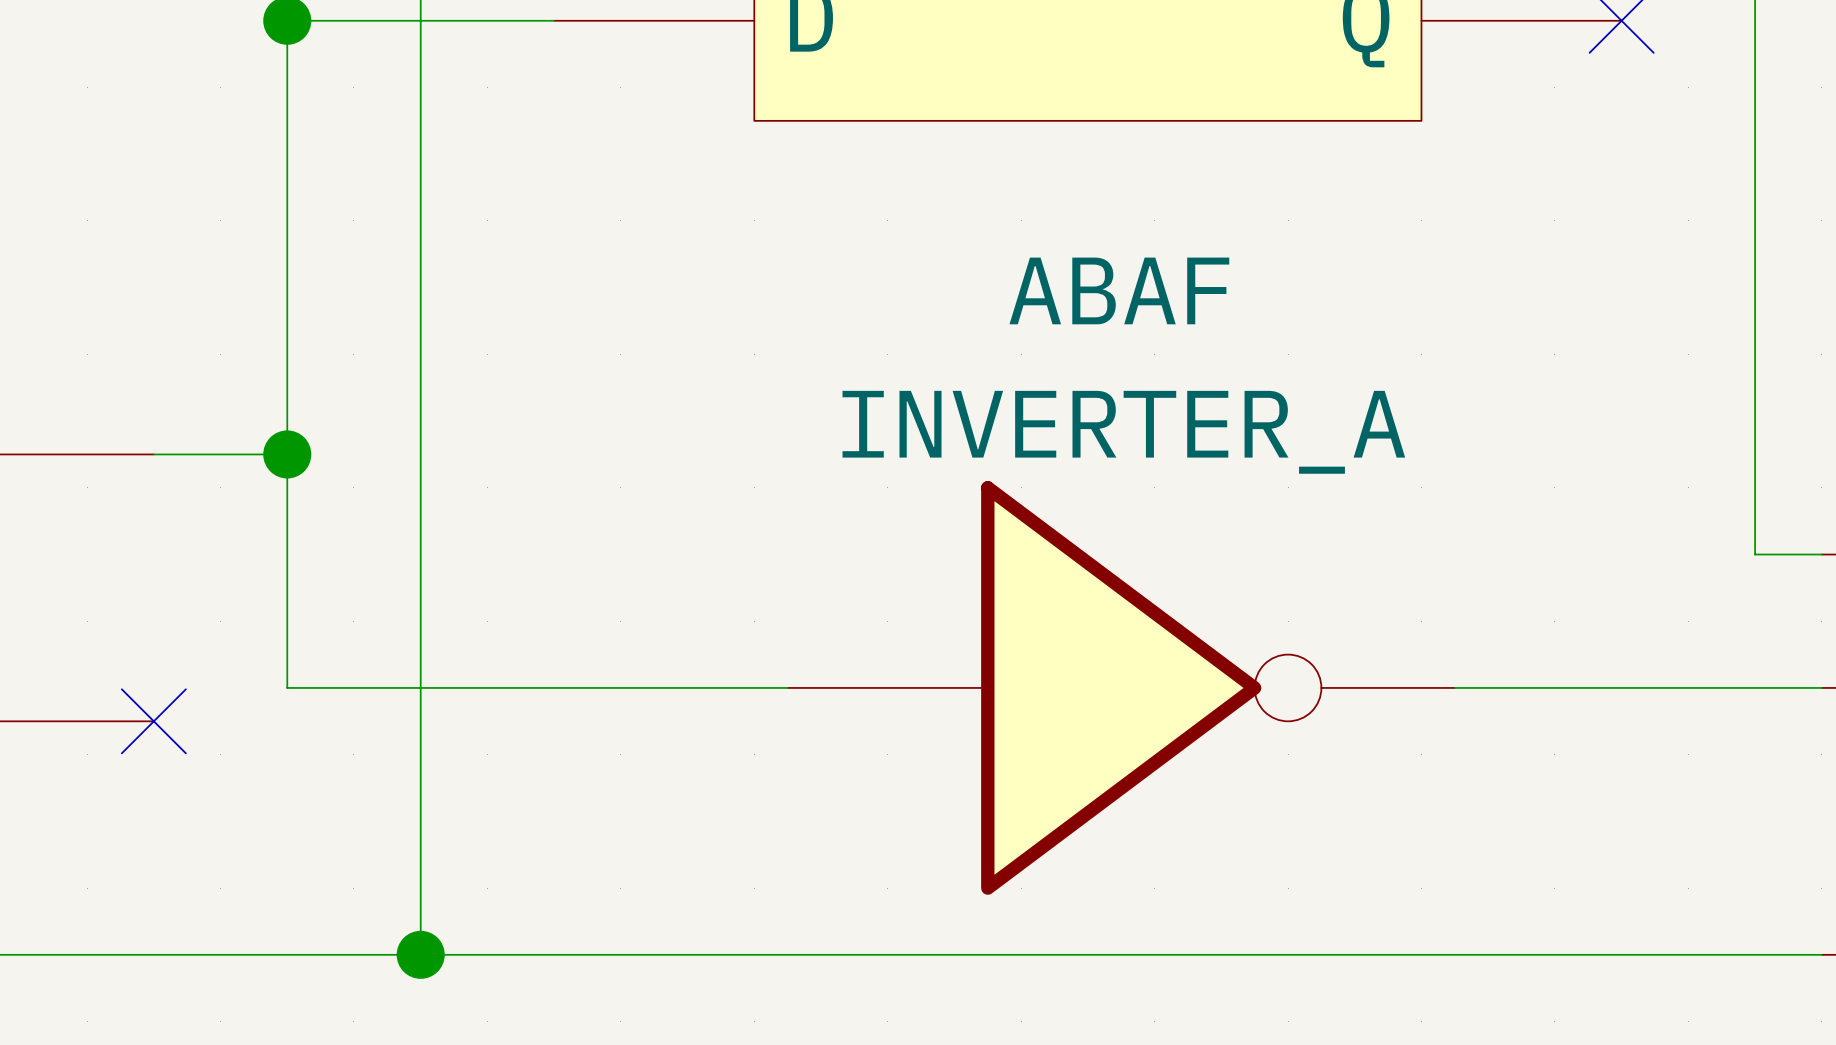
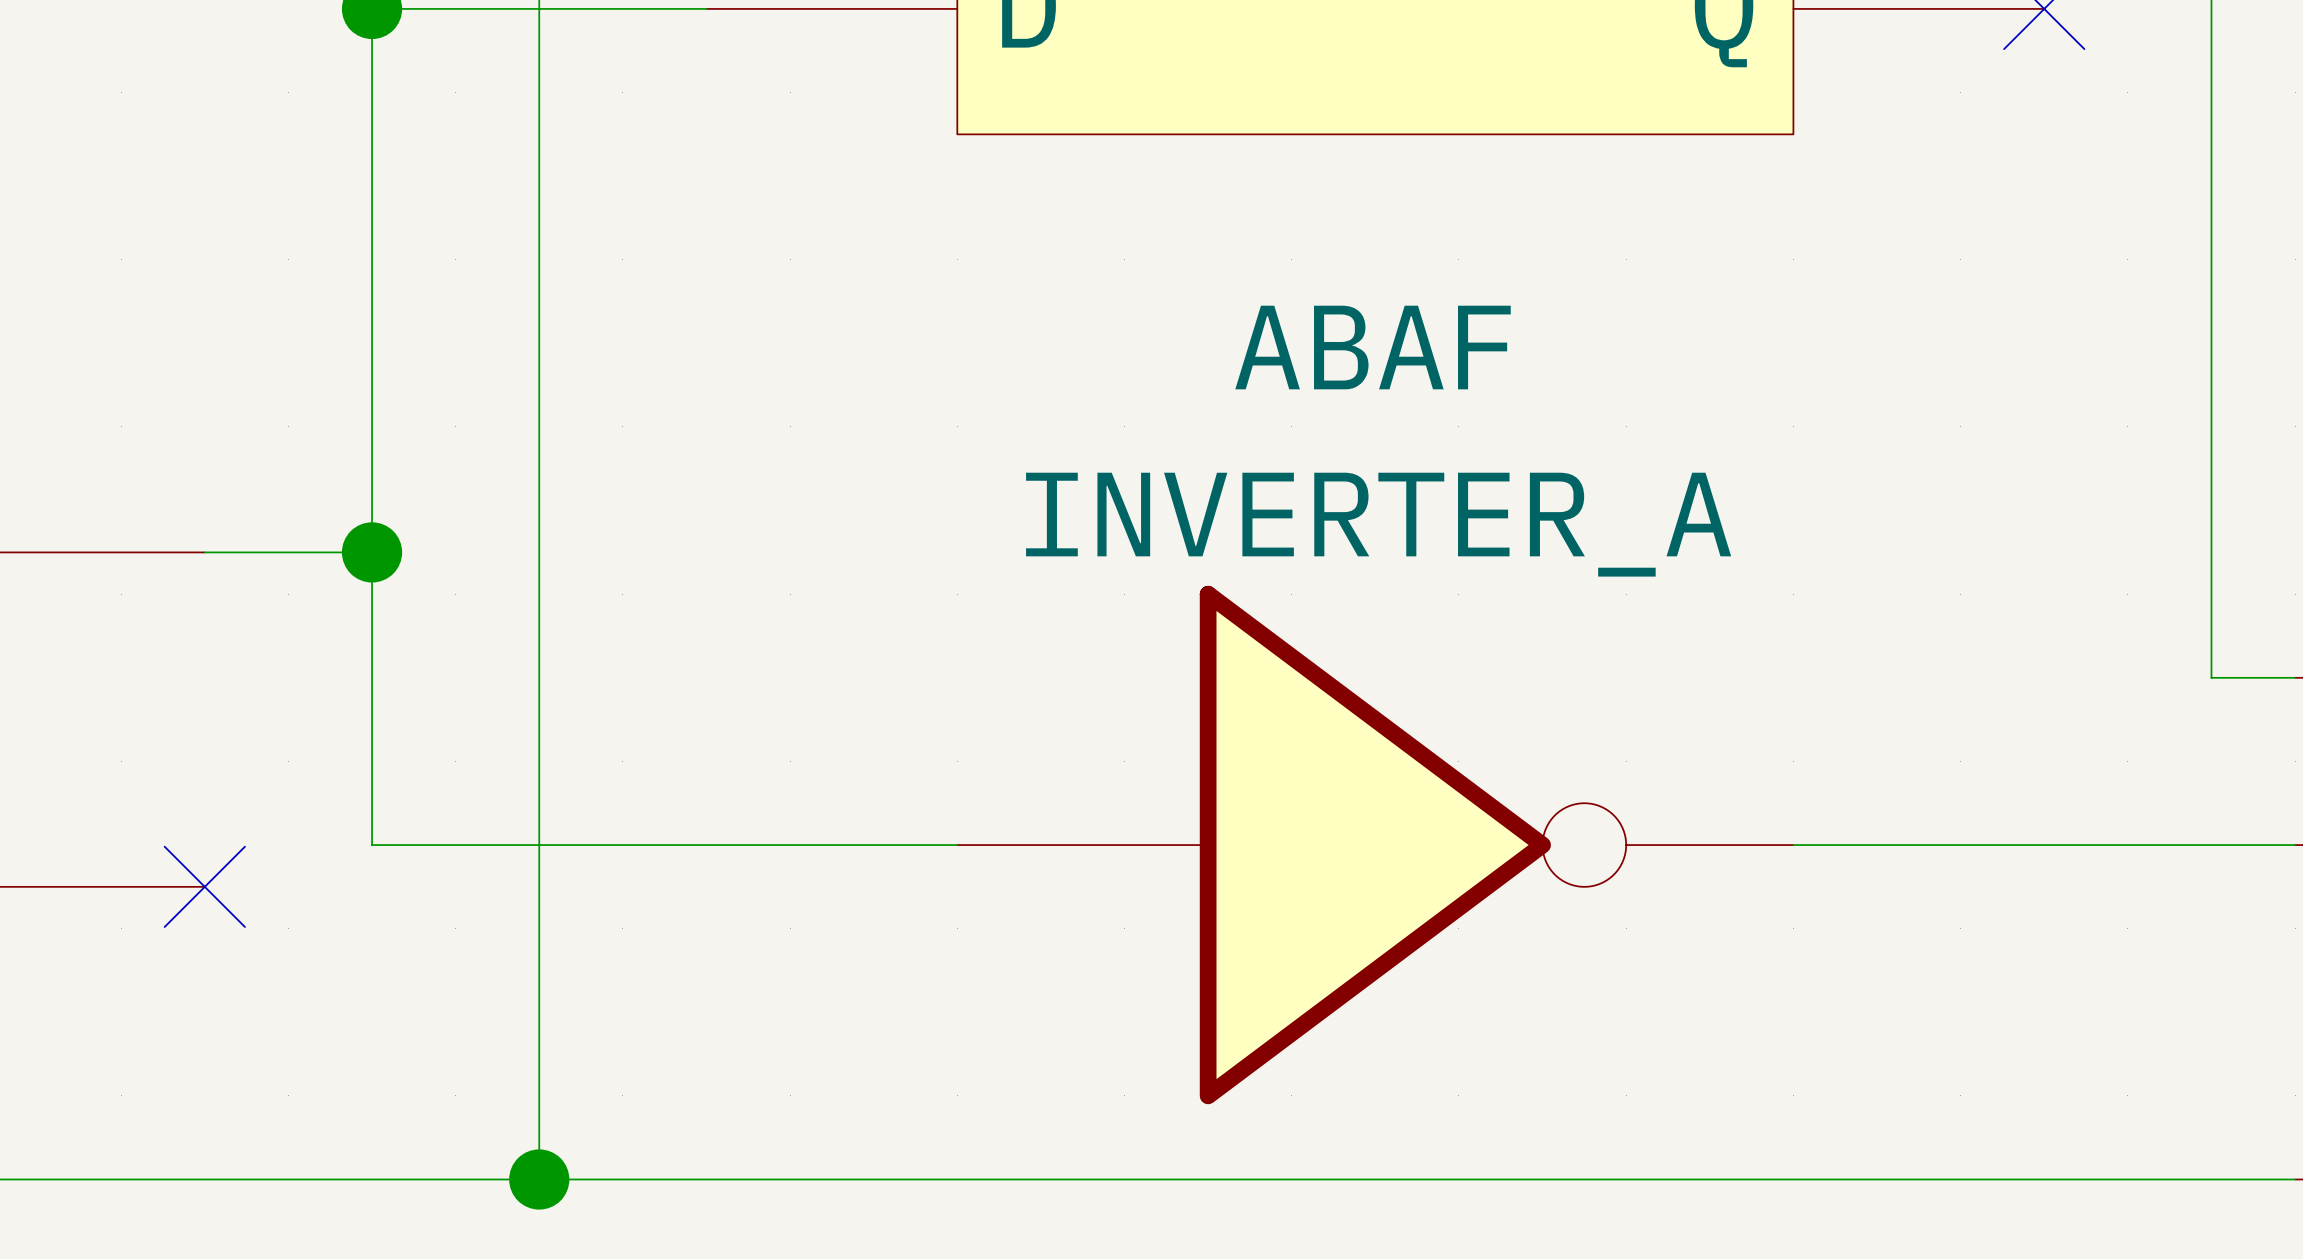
ABAF position: (1121, 687) -> (1375, 845)

